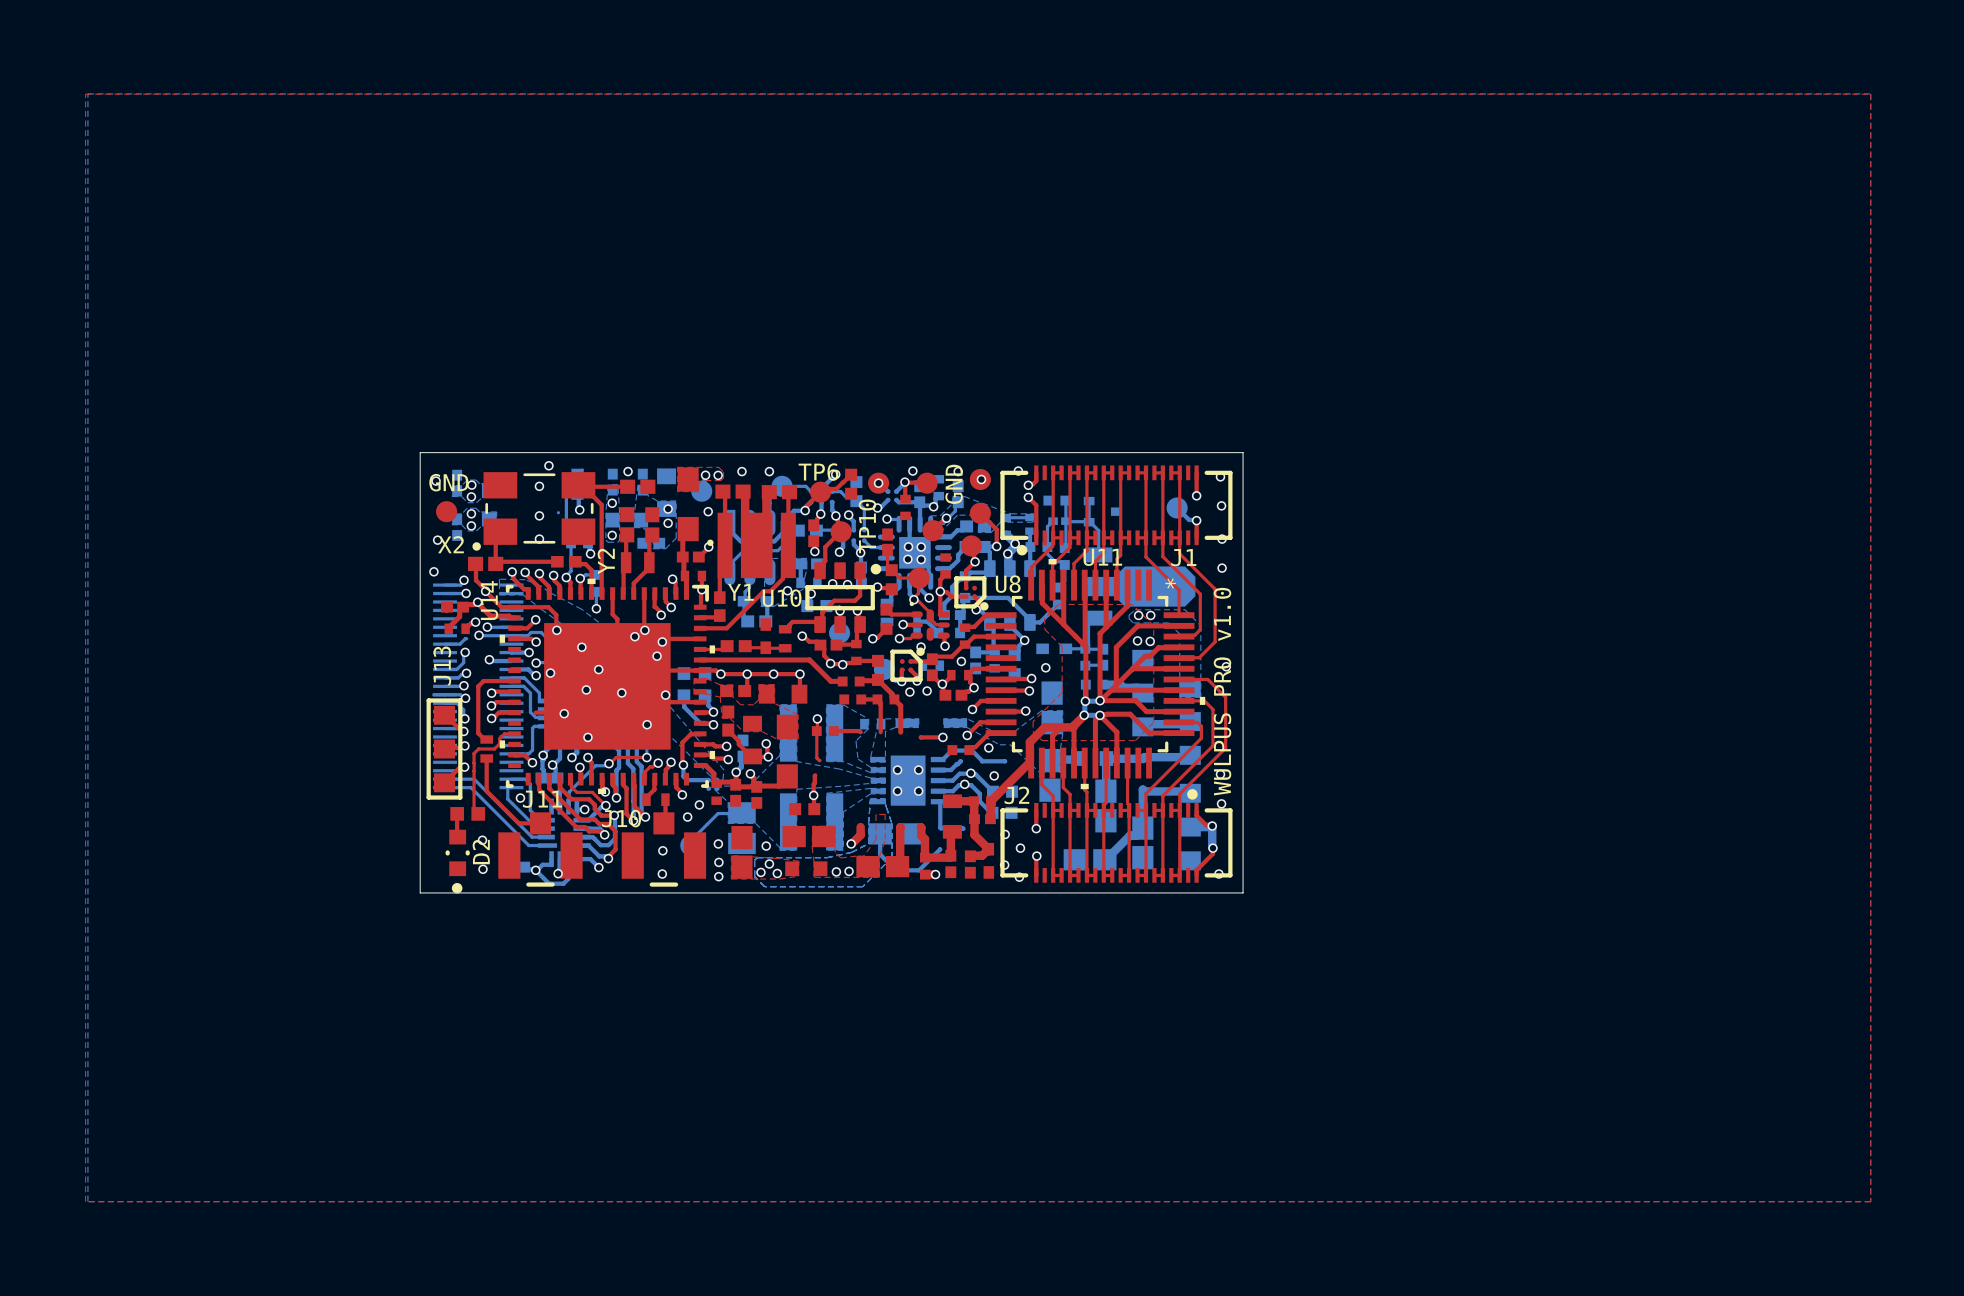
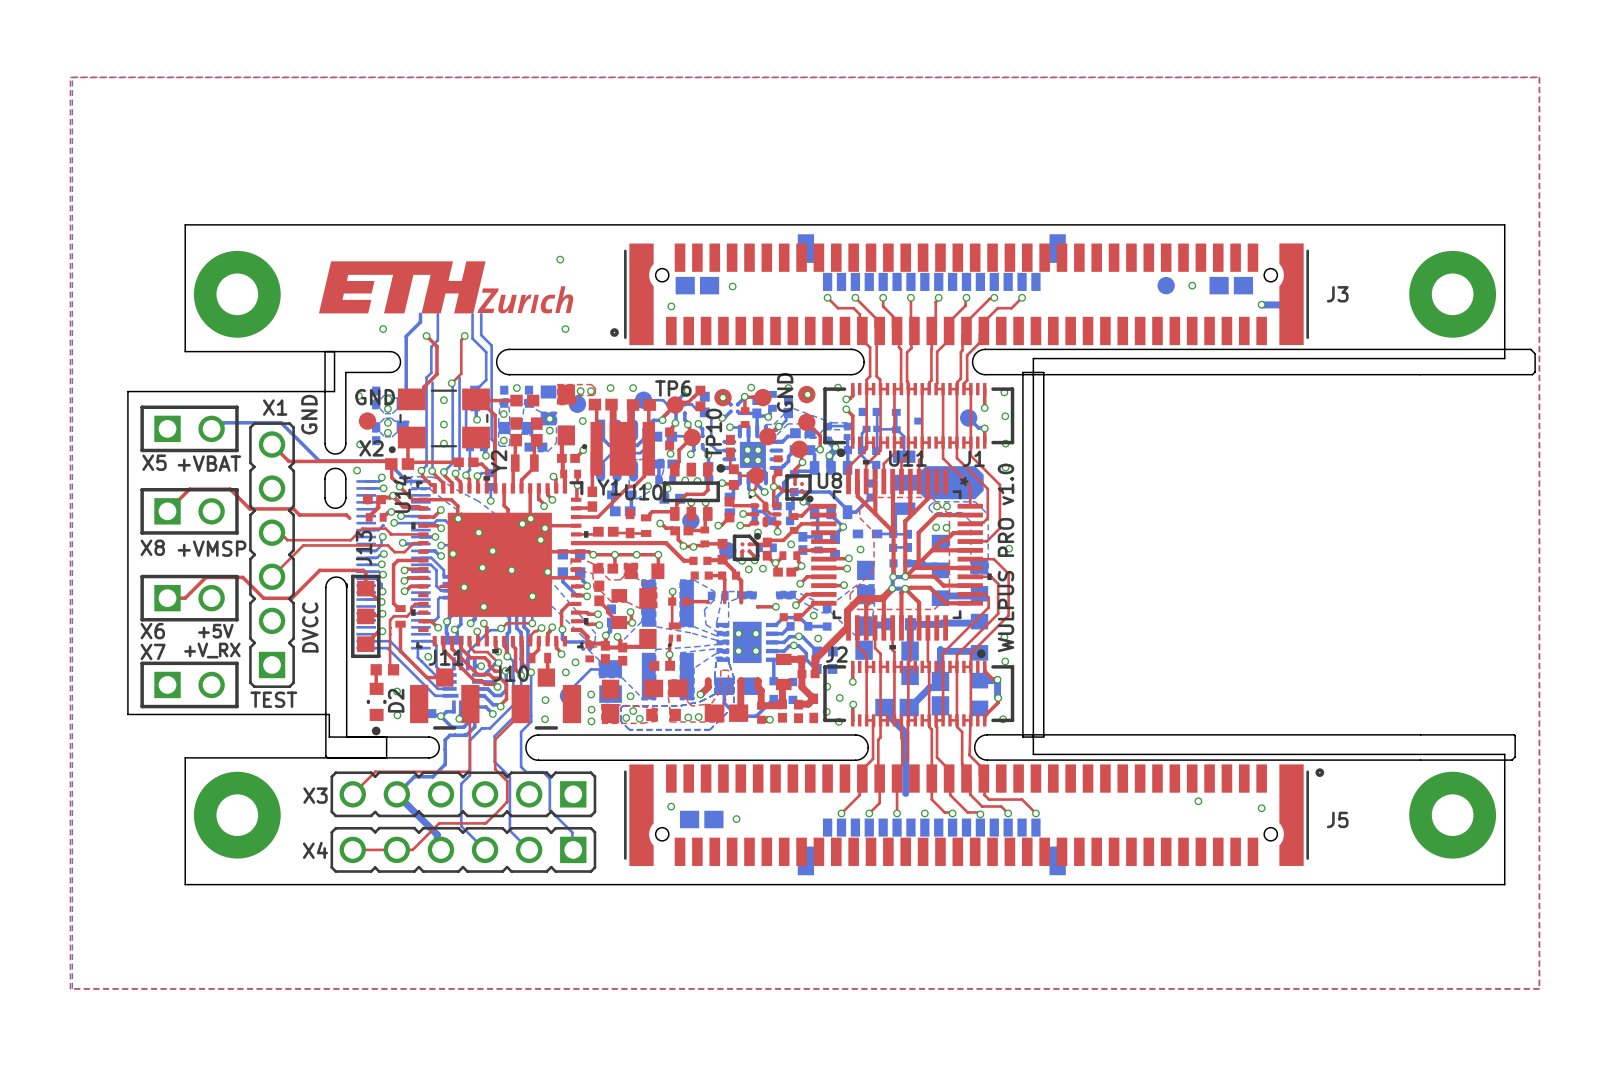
via: none -> (560, 259)
part: none -> (931, 262)
part: none -> (697, 285)
part: none -> (1166, 285)
via: none -> (1192, 285)
part: none -> (1231, 285)
via: none -> (732, 286)
part: none -> (446, 287)
part: none -> (237, 294)
J3: none -> (959, 294)
part: none -> (1452, 294)
top track: none -> (827, 297) (838, 308) (853, 308) (859, 314) (859, 337) (870, 347) (870, 376) (866, 379) (866, 389)
via: none -> (827, 297)
top track: none -> (855, 297) (875, 318) (875, 327) (879, 330)
via: none -> (855, 297)
top track: none -> (883, 297) (883, 306) (893, 316) (893, 326) (899, 332) (901, 388)
via: none -> (883, 297)
top track: none -> (910, 297) (910, 327) (914, 330) (911, 333) (911, 348) (907, 352) (907, 388)
via: none -> (910, 297)
top track: none -> (938, 297) (935, 302) (935, 326) (931, 330) (931, 380) (929, 388)
via: none -> (938, 297)
top track: none -> (966, 297) (965, 305) (949, 322) (949, 339) (937, 351) (936, 384)
via: none -> (966, 297)
top track: none -> (994, 297) (989, 298) (966, 322) (966, 330) (962, 334) (960, 378) (957, 382) (957, 388)
via: none -> (994, 297)
top track: none -> (1022, 297) (1011, 308) (997, 308) (983, 322) (983, 330) (979, 334) (979, 343) (967, 355) (967, 380) (964, 383) (964, 388)
via: none -> (1022, 297)
bottom track: none -> (1261, 304) (1287, 306)
via: none -> (1261, 304)
via: none -> (671, 306)
bottom track: none -> (420, 314) (420, 322) (406, 336) (406, 400)
bottom track: none -> (437, 314) (437, 340) (431, 346) (431, 372) (426, 377) (426, 465) (421, 470)
bottom track: none -> (472, 314) (472, 338) (486, 352) (486, 380) (479, 387)
bottom track: none -> (481, 314) (481, 335) (491, 345) (491, 439) (494, 442) (494, 469) (490, 473)
via: none -> (383, 329)
via: none -> (565, 329)
top track: none -> (879, 330) (876, 333) (876, 376) (880, 379) (880, 388)
top track: none -> (426, 335) (436, 346) (436, 374) (423, 387) (423, 390)
via: none -> (426, 335)
top track: none -> (464, 335) (461, 340) (461, 373) (451, 383)
via: none -> (464, 335)
board edge: none -> (509, 349) (851, 349) (860, 353) (864, 362) (860, 370) (851, 374) (509, 374) (500, 370) (496, 362) (500, 353) (509, 349)
board edge: none -> (985, 349) (1530, 349) (1535, 353) (1535, 372) (1532, 374) (985, 374) (976, 370) (972, 362) (976, 353) (980, 350) (981, 349) (983, 349) (985, 349)
board edge: none -> (325, 351) (325, 446) (330, 452) (336, 453) (342, 450) (345, 443)
board edge: (474, 452) (1243, 452) -> (390, 372) (396, 370) (400, 363) (398, 355) (391, 351) (390, 351) (185, 351) (185, 224) (1504, 224) (1504, 358) (1033, 358) (1033, 754) (1504, 754) (1504, 884) (185, 884) (185, 757) (428, 757) (434, 756) (438, 749) (437, 741) (430, 737) (329, 737) (329, 714) (127, 714) (127, 391) (334, 391) (334, 351)
bottom track: none -> (459, 377) (459, 469)
bottom track: none -> (432, 382) (432, 470)
bottom track: none -> (452, 384) (452, 463) (443, 472)
text: none -> GND (309, 414)
X5: none -> (189, 428)
bottom track: none -> (211, 428) (217, 428) (223, 422) (281, 422) (319, 460) (386, 460) (407, 481) (420, 481)
board edge: (420, 539) (420, 581) -> (345, 497) (340, 507) (334, 508) (328, 505) (325, 499) (324, 478) (328, 470) (335, 468) (342, 470) (345, 478)
top track: none -> (272, 444) (288, 461) (388, 461)
text: none -> +VBAT (209, 463)
board edge: (420, 605) (420, 892) (1199, 892) -> (1022, 372) (1043, 372) (1043, 737) (1022, 737) (1022, 734) (1514, 734) (1515, 757) (1512, 760) (987, 760) (977, 755) (974, 747) (978, 738) (987, 734)
top track: none -> (167, 511) (189, 489) (230, 489) (249, 508) (293, 508) (299, 514) (346, 514) (349, 518)
X8: none -> (189, 511)
top track: none -> (272, 532) (276, 537) (284, 537) (287, 540) (350, 540) (362, 528) (385, 528) (390, 533)
top track: none -> (390, 533) (423, 534)
top track: none -> (423, 543) (413, 543) (404, 552) (394, 552) (387, 545) (303, 545) (272, 576)
text: none -> +VMSP (212, 548)
X1: none -> (272, 555)
top track: none -> (365, 588) (365, 572) (363, 570) (319, 570) (291, 598) (263, 598) (242, 577) (205, 577) (185, 598) (167, 598)
X6: none -> (189, 598)
part: none -> (827, 617)
part: none -> (799, 626)
text: none -> +5V (215, 631)
text: none -> DVCC (310, 627)
part: none -> (674, 634)
text: none -> +V_RX (212, 650)
bottom track: none -> (508, 656) (513, 661) (513, 704) (489, 728) (481, 728) (469, 740) (469, 775) (461, 783) (461, 826) (485, 849)
bottom track: none -> (531, 672) (531, 721) (521, 731) (521, 766) (526, 772) (543, 772) (549, 778) (549, 809) (572, 832) (572, 849)
bottom track: none -> (521, 676) (521, 709) (494, 736) (494, 761) (509, 777) (509, 830) (532, 852)
X7: none -> (189, 684)
part: none -> (773, 690)
part: none -> (792, 690)
text: none -> TEST (273, 699)
top track: none -> (469, 704) (469, 770) (468, 771) (375, 771) (352, 794)
bottom track: none -> (474, 707) (474, 726) (466, 735) (449, 735) (445, 740) (445, 749)
bottom track: none -> (891, 712) (891, 717) (905, 732) (905, 793)
top track: none -> (520, 714) (495, 739) (495, 769) (507, 781) (506, 802)
top track: none -> (880, 720) (880, 737) (878, 739) (879, 803) (869, 813)
top track: none -> (901, 720) (902, 764) (897, 769) (897, 813)
top track: none -> (907, 720) (907, 760)
top track: none -> (929, 720) (929, 727) (931, 729) (931, 799) (944, 812) (952, 813)
top track: none -> (936, 720) (937, 757) (949, 769) (950, 795) (967, 812) (979, 812) (980, 814)
top track: none -> (957, 720) (957, 727) (962, 732) (962, 764) (966, 769) (966, 778) (970, 782) (970, 794) (982, 806) (1001, 806) (1008, 813)
top track: none -> (970, 724) (969, 755) (979, 765) (979, 774) (984, 779) (984, 795) (989, 799) (1022, 799) (1035, 813)
top track: none -> (873, 726) (873, 758) (862, 769) (859, 795) (841, 813)
board edge: none -> (538, 735) (855, 735) (864, 738) (868, 747) (864, 756) (855, 760) (538, 760) (529, 756) (525, 747) (529, 738) (538, 735)
board edge: none -> (346, 737) (346, 583) (346, 587) (346, 586) (346, 583) (343, 579) (335, 577) (328, 580) (325, 587) (325, 756) (327, 757)
board edge: none -> (386, 737) (386, 757)
bottom track: none -> (445, 749) (445, 764) (432, 776) (414, 776) (396, 794) (437, 834) (437, 846) (440, 849)
X3: none -> (463, 794)
via: none -> (1198, 801)
top track: none -> (506, 802) (485, 823) (439, 823) (412, 849) (352, 849)
via: none -> (671, 806)
via: none -> (1261, 808)
via: none -> (841, 813)
via: none -> (869, 813)
via: none -> (897, 813)
via: none -> (924, 813)
via: none -> (952, 813)
via: none -> (1008, 813)
via: none -> (1035, 813)
via: none -> (980, 814)
part: none -> (237, 815)
J5: none -> (974, 815)
part: none -> (1452, 815)
part: none -> (701, 819)
via: none -> (736, 819)
part: none -> (931, 846)
X4: none -> (463, 849)

